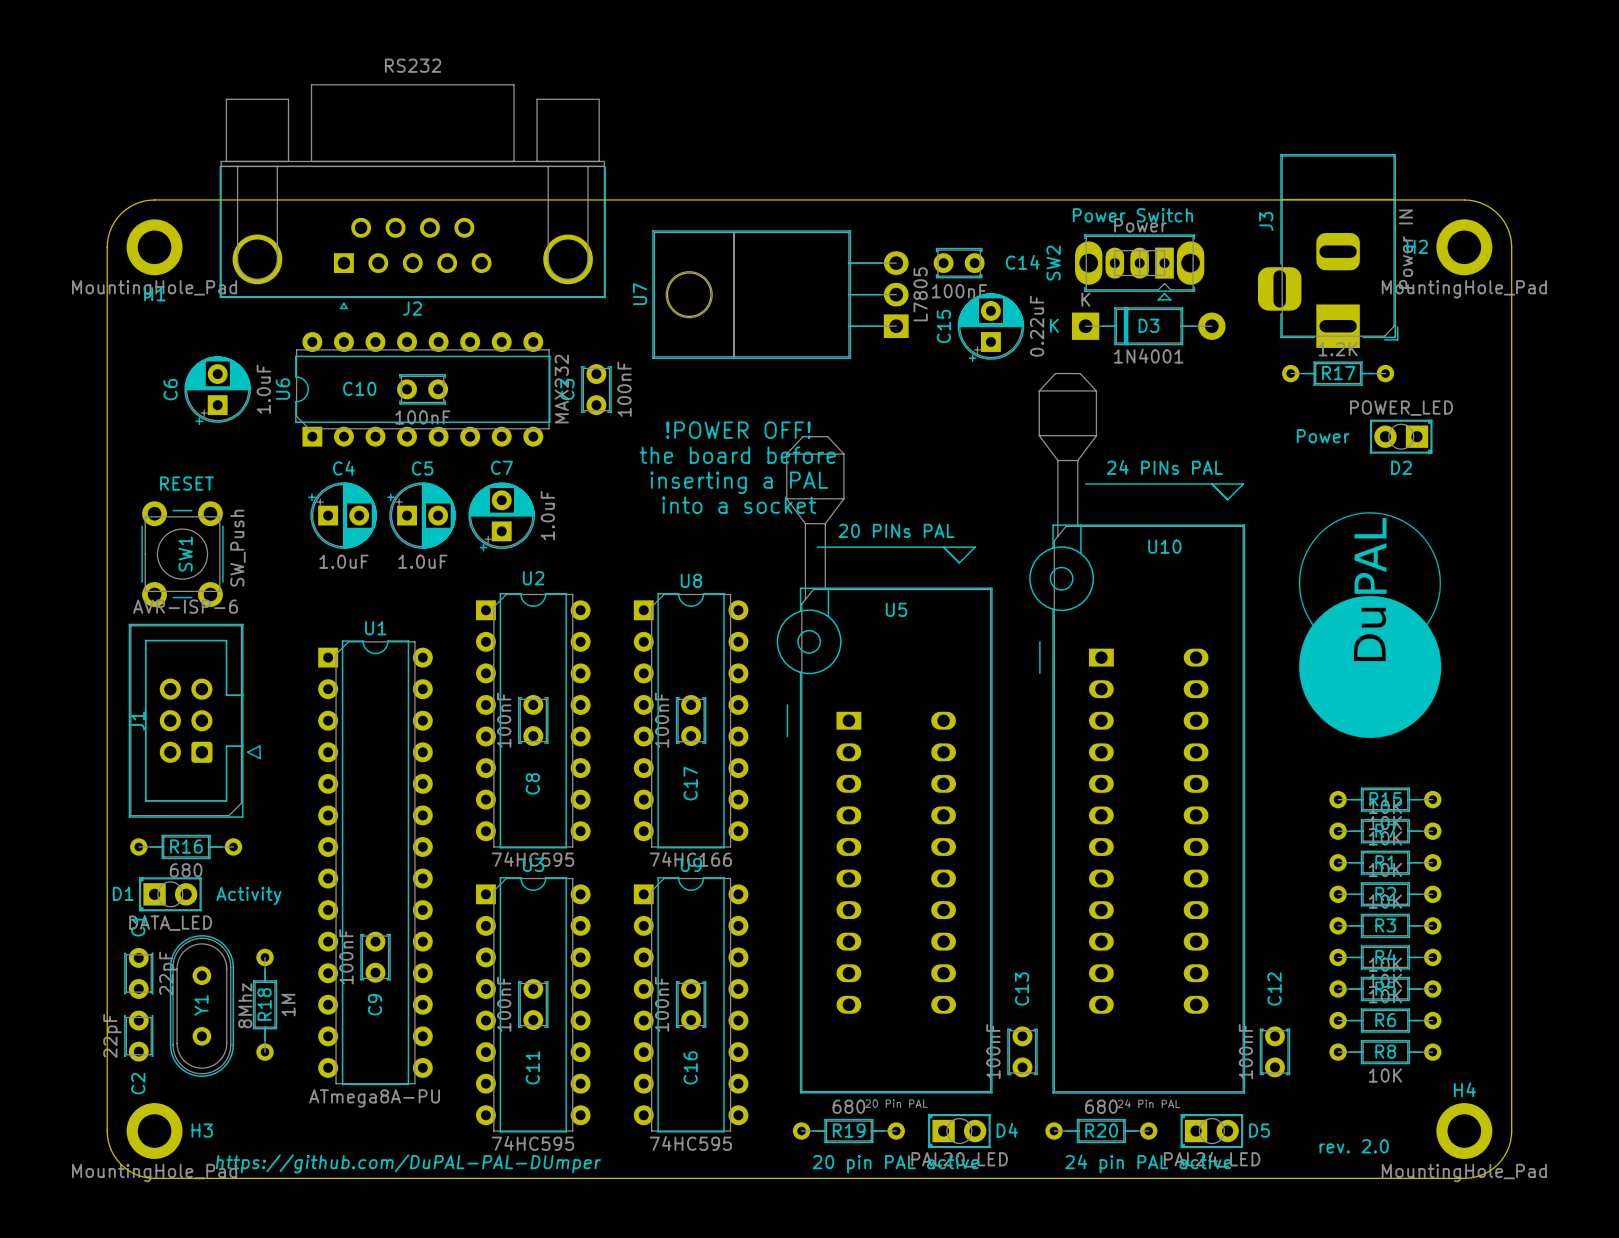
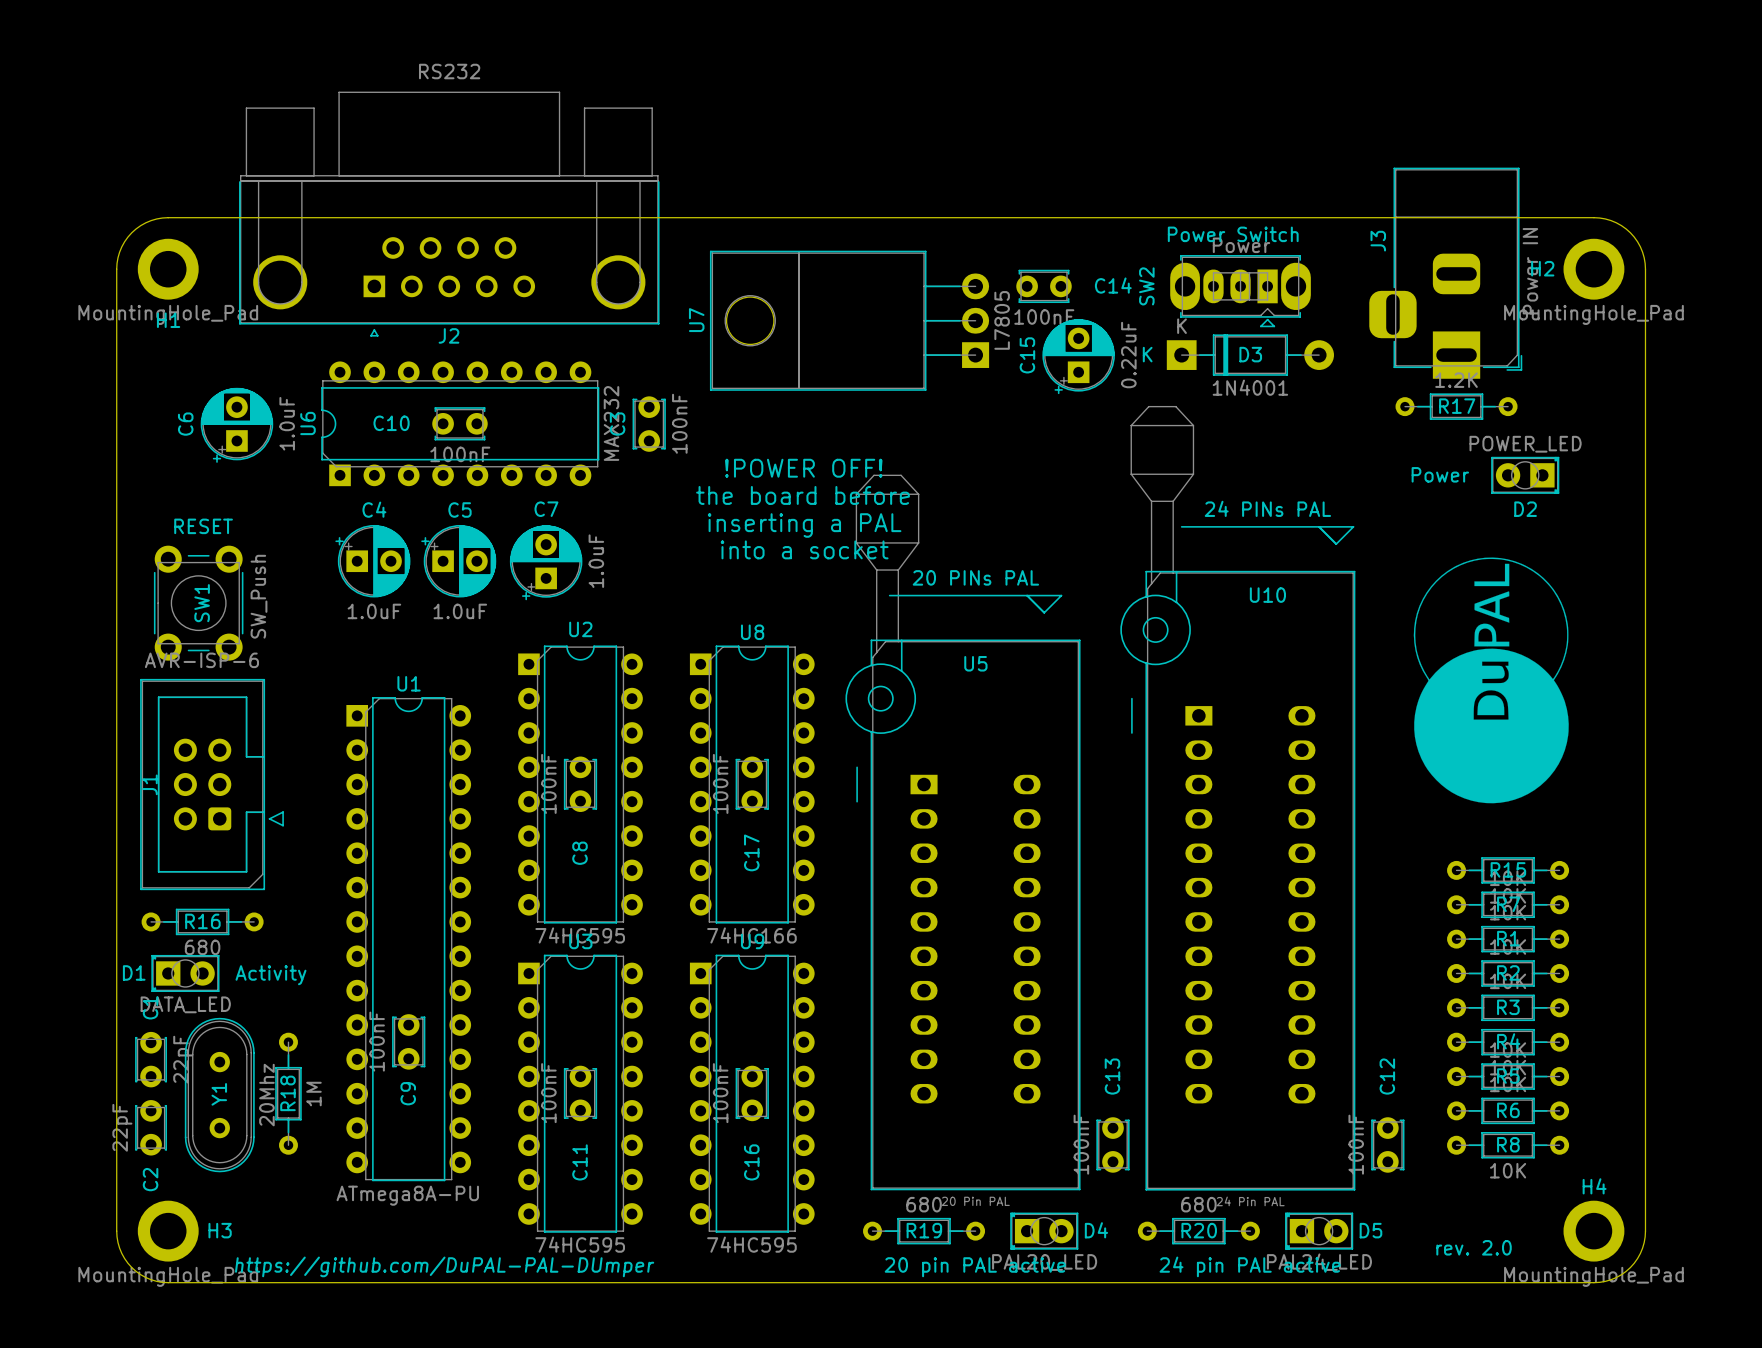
Y1 value: 8Mhz (245, 1005) -> 20Mhz (266, 1095)

